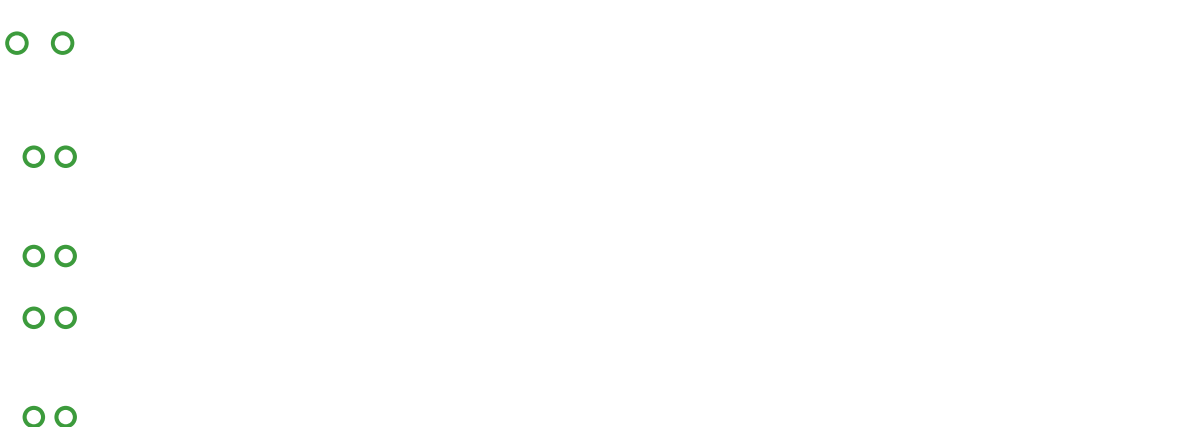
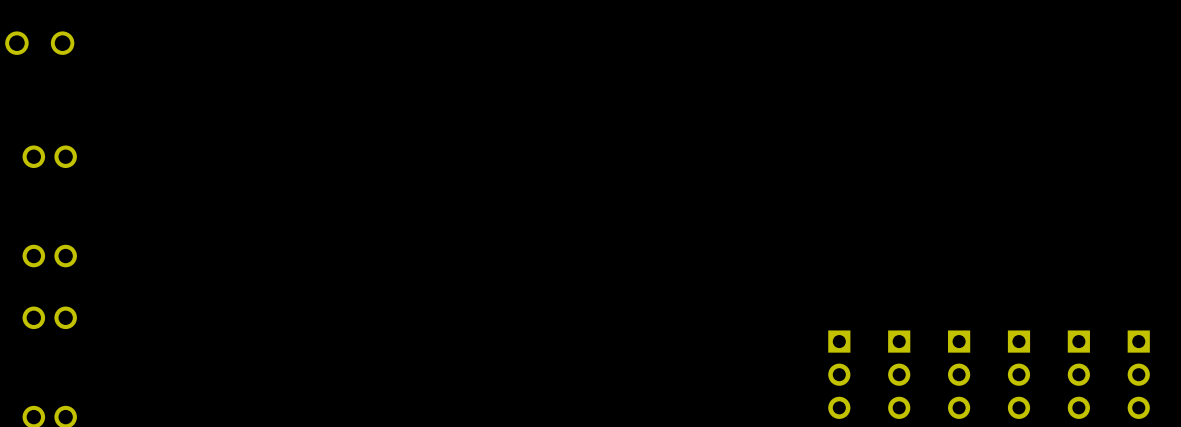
part: none -> (839, 374)
part: none -> (899, 374)
part: none -> (959, 374)
part: none -> (1018, 374)
part: none -> (1078, 374)
part: none -> (1138, 374)

